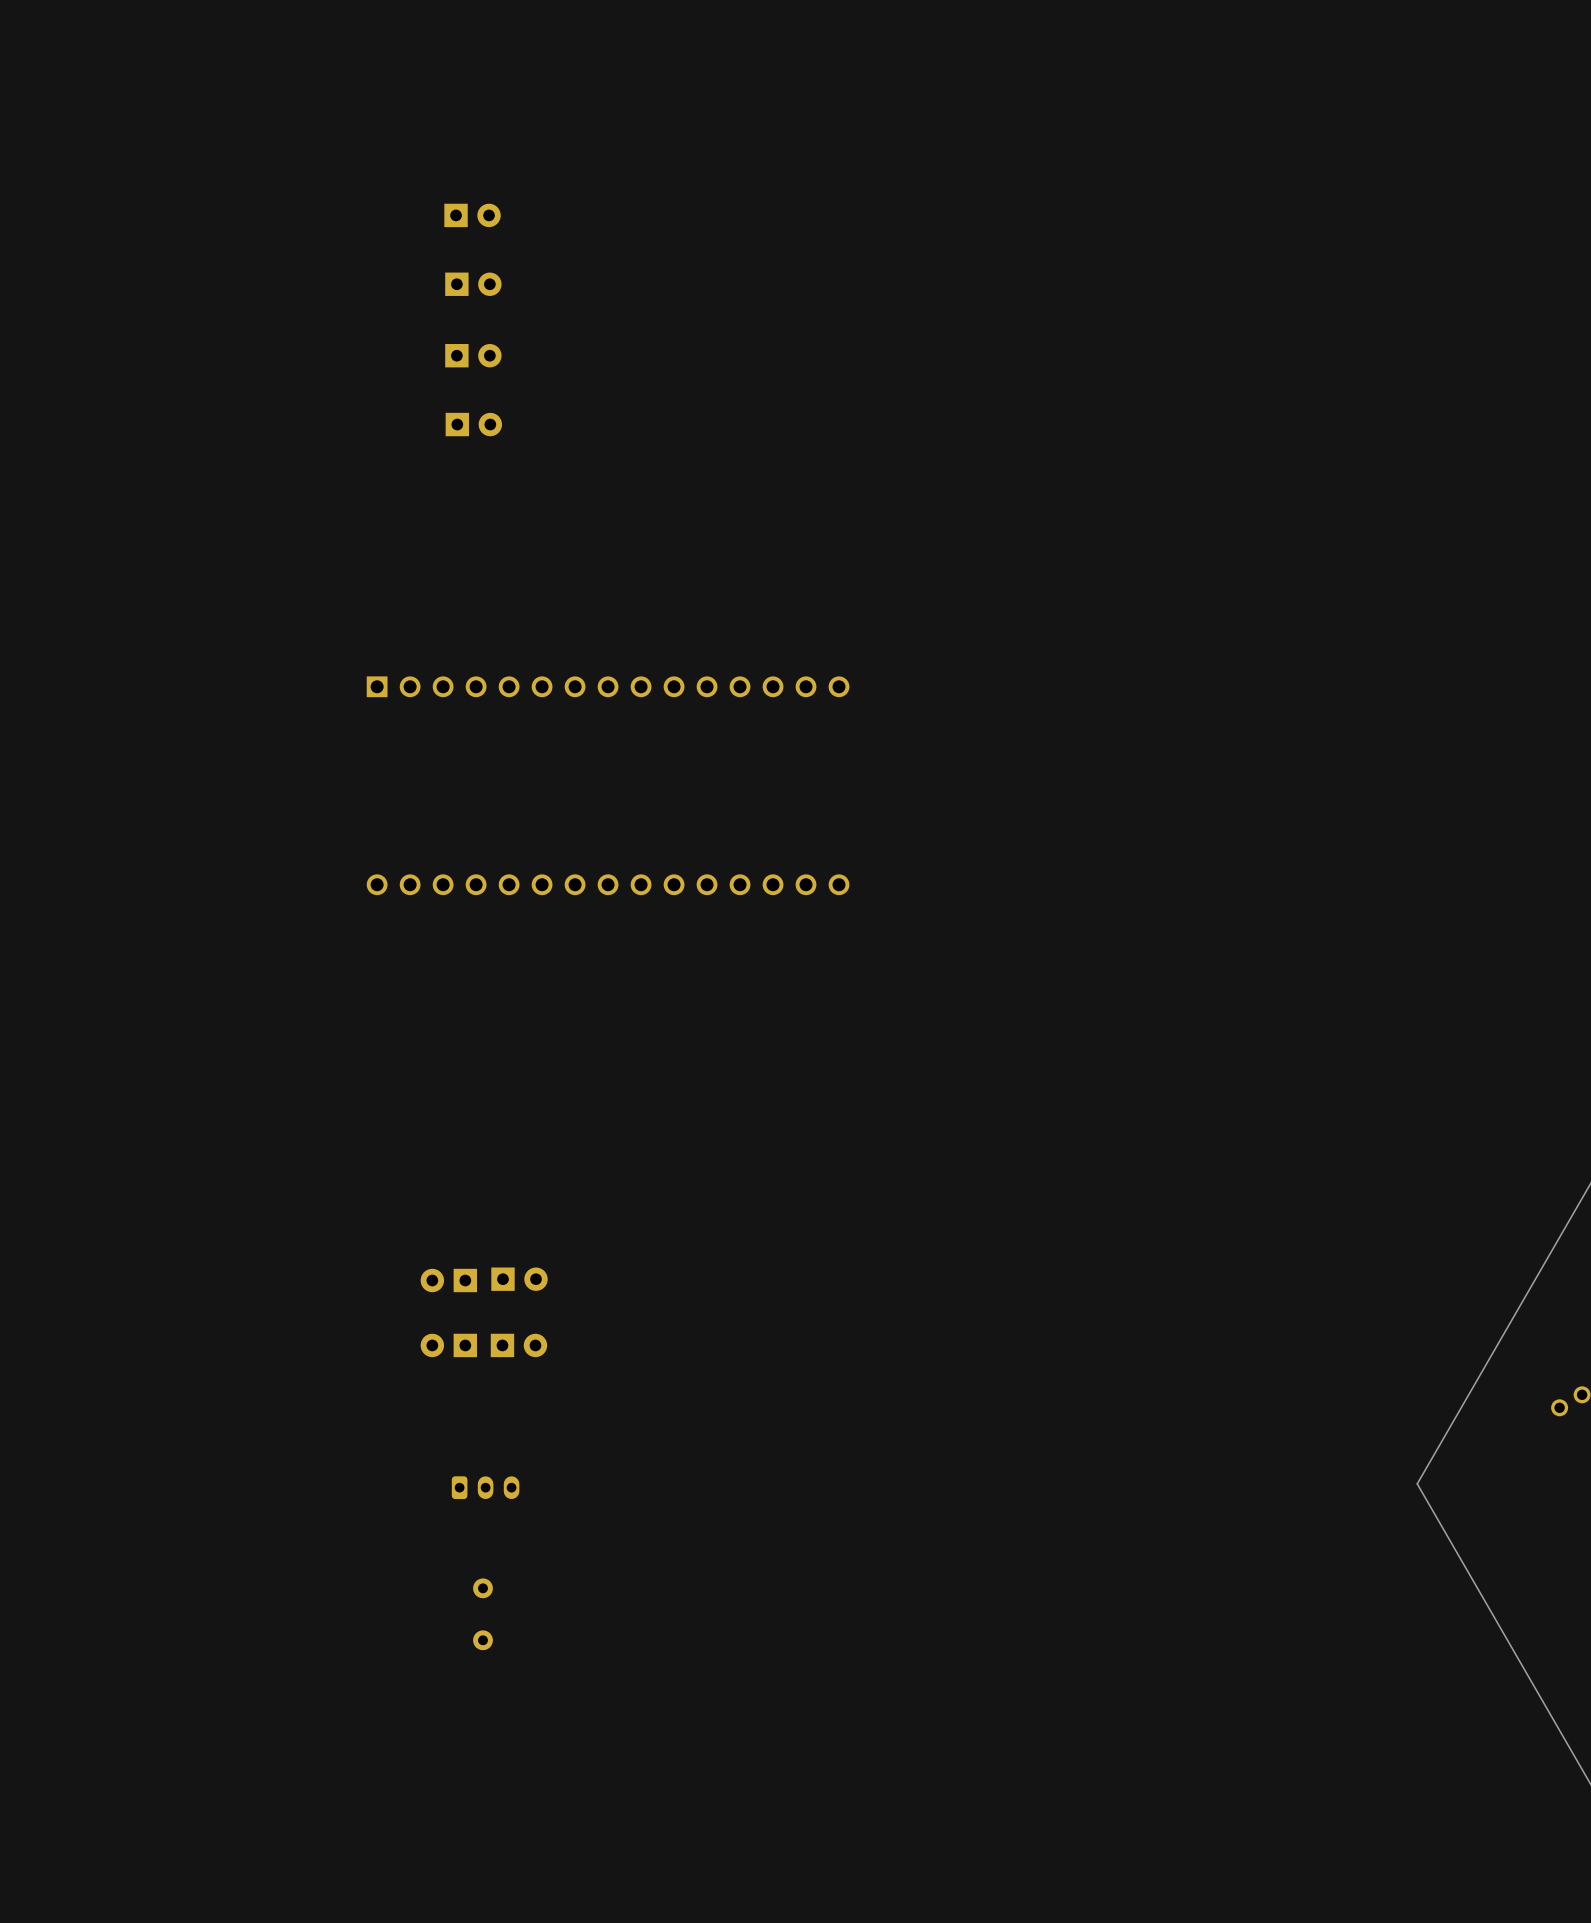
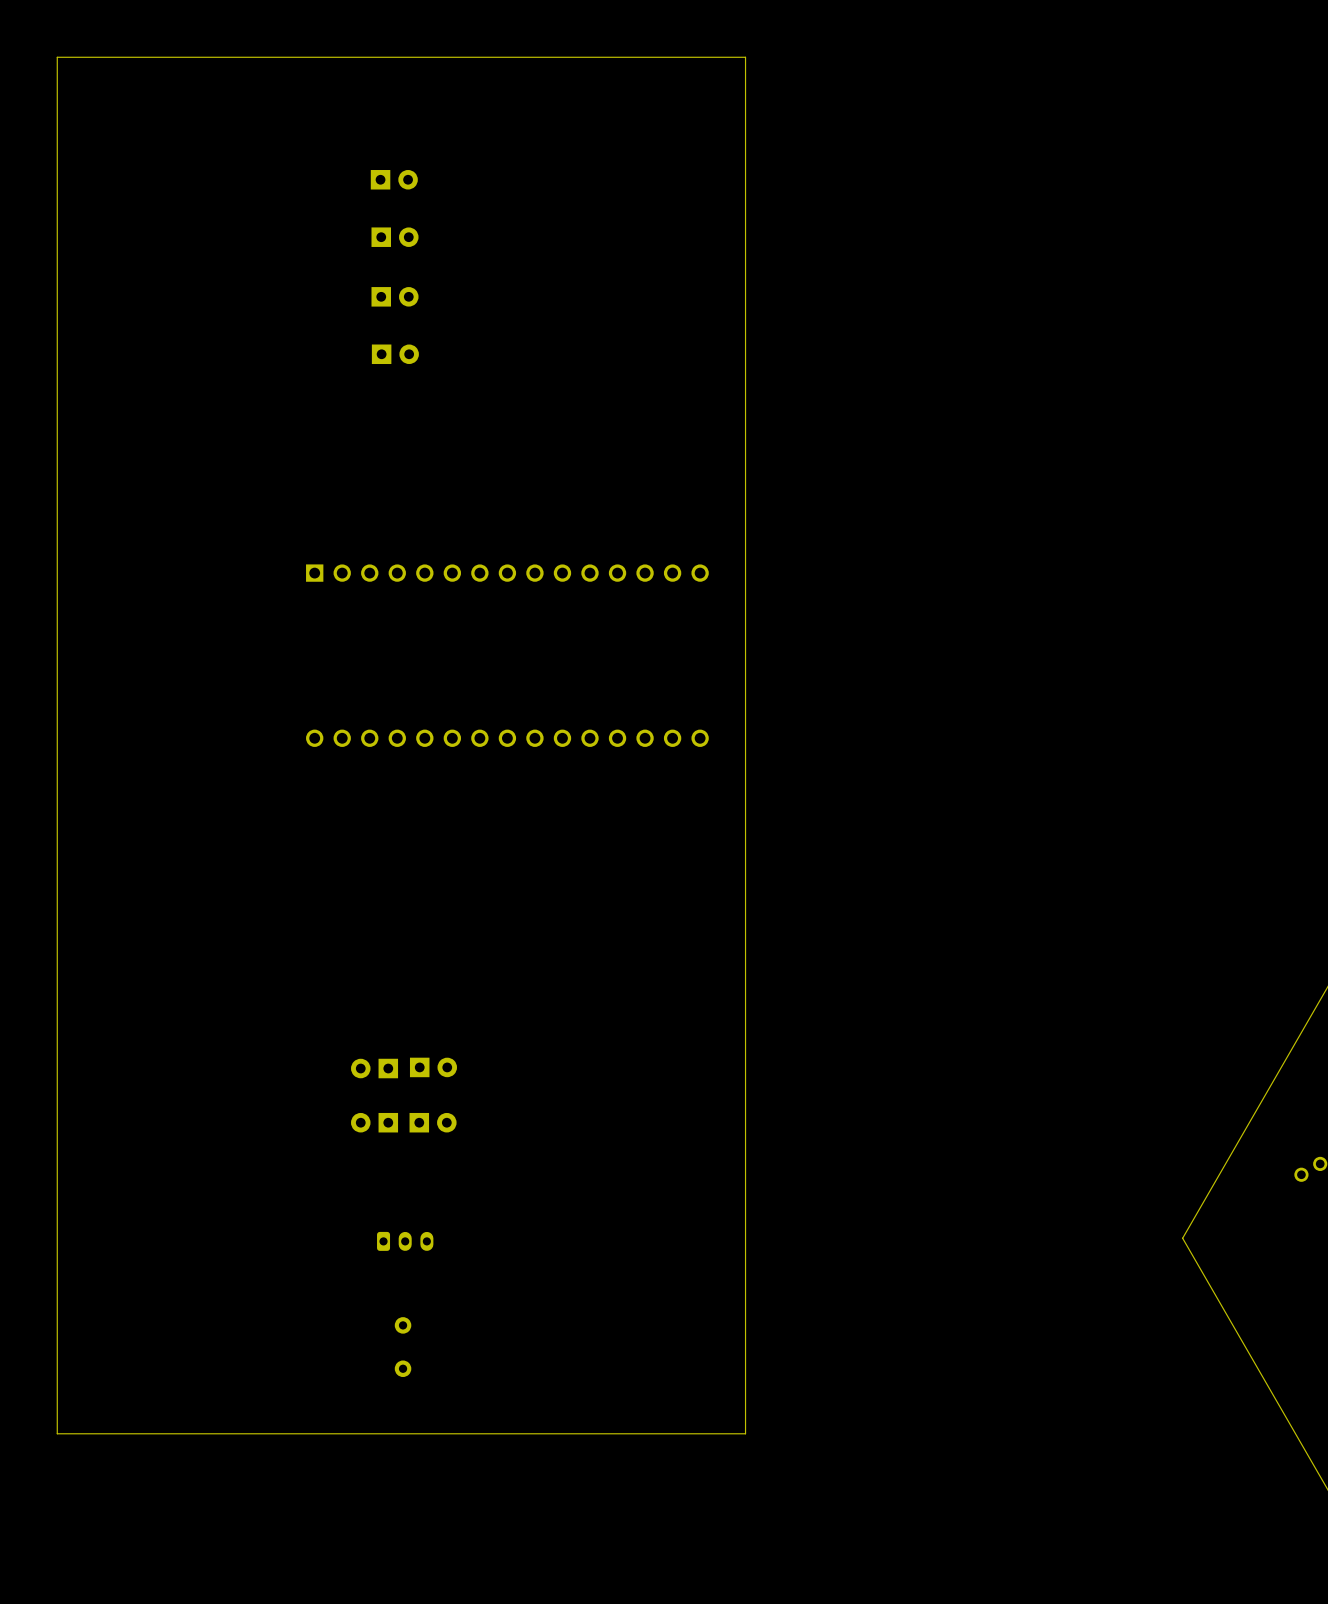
board edge: none -> (745, 57) (57, 57) (57, 1433) (745, 1433) (745, 57)

